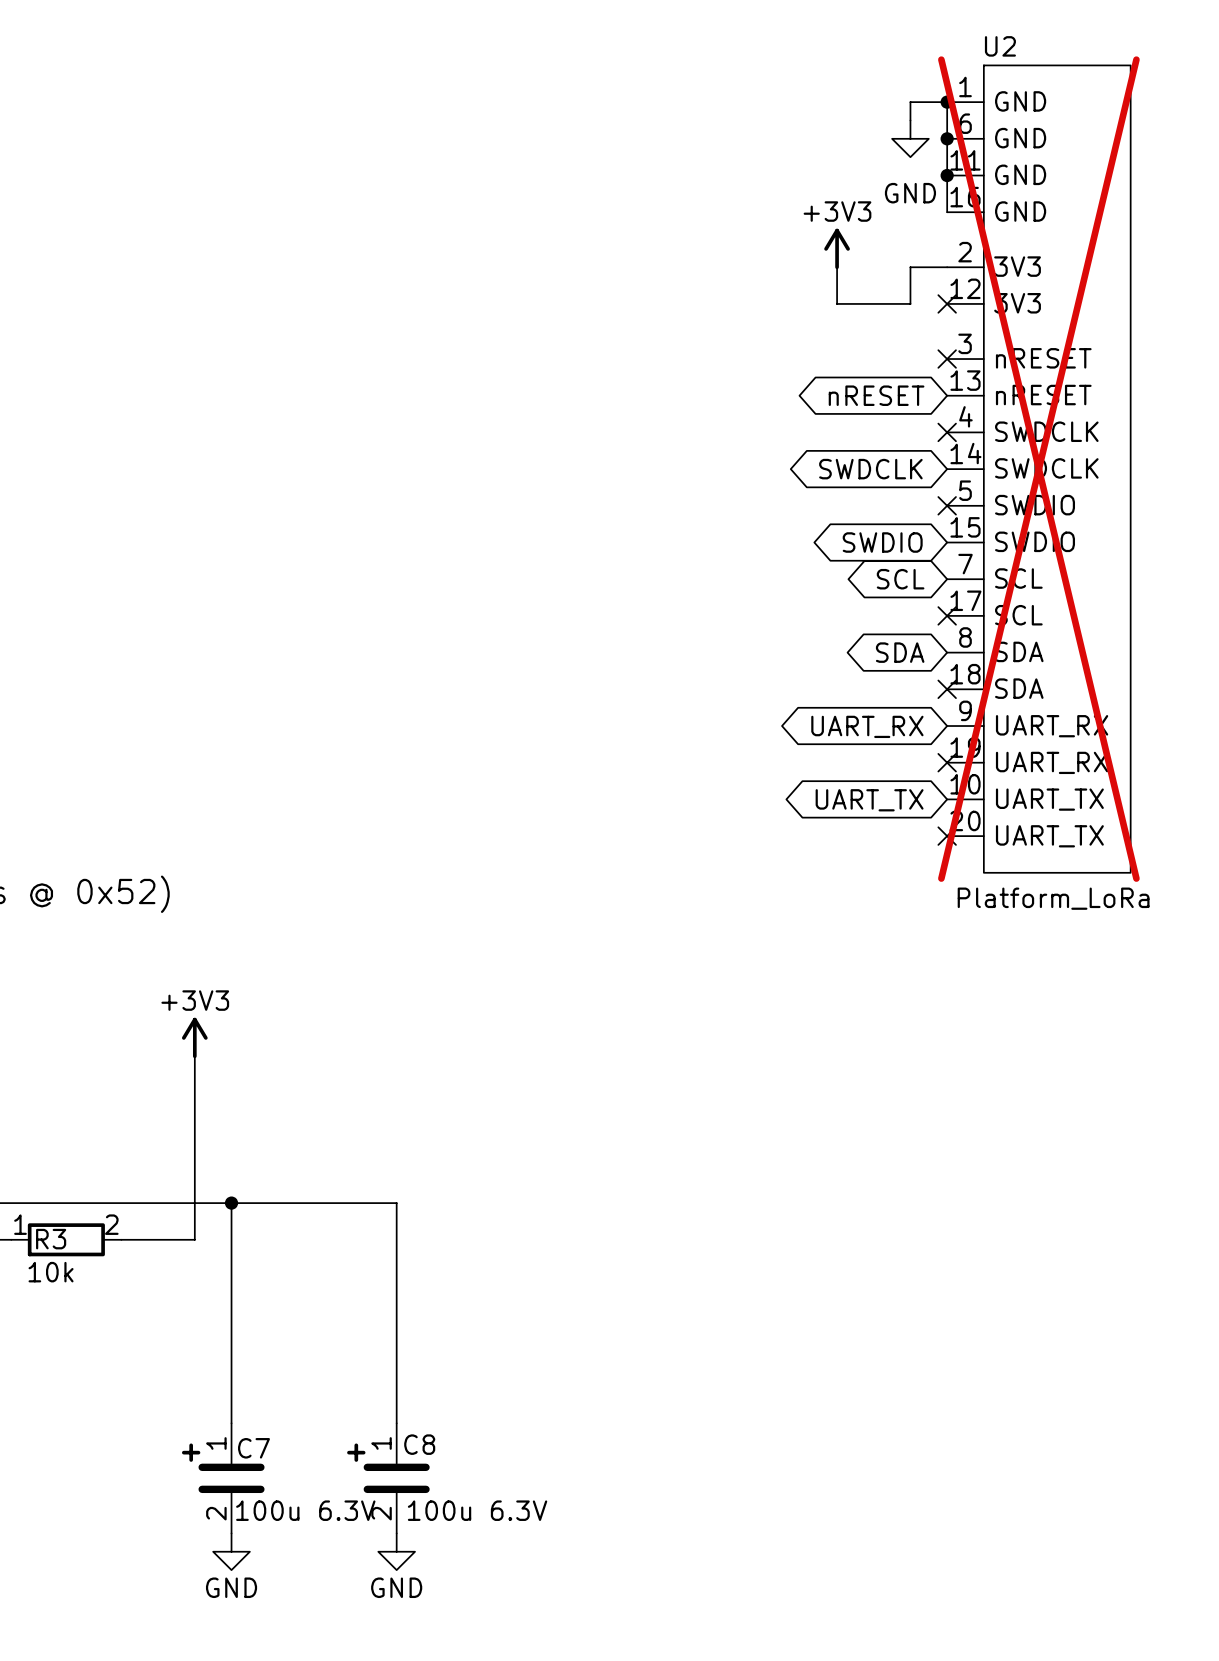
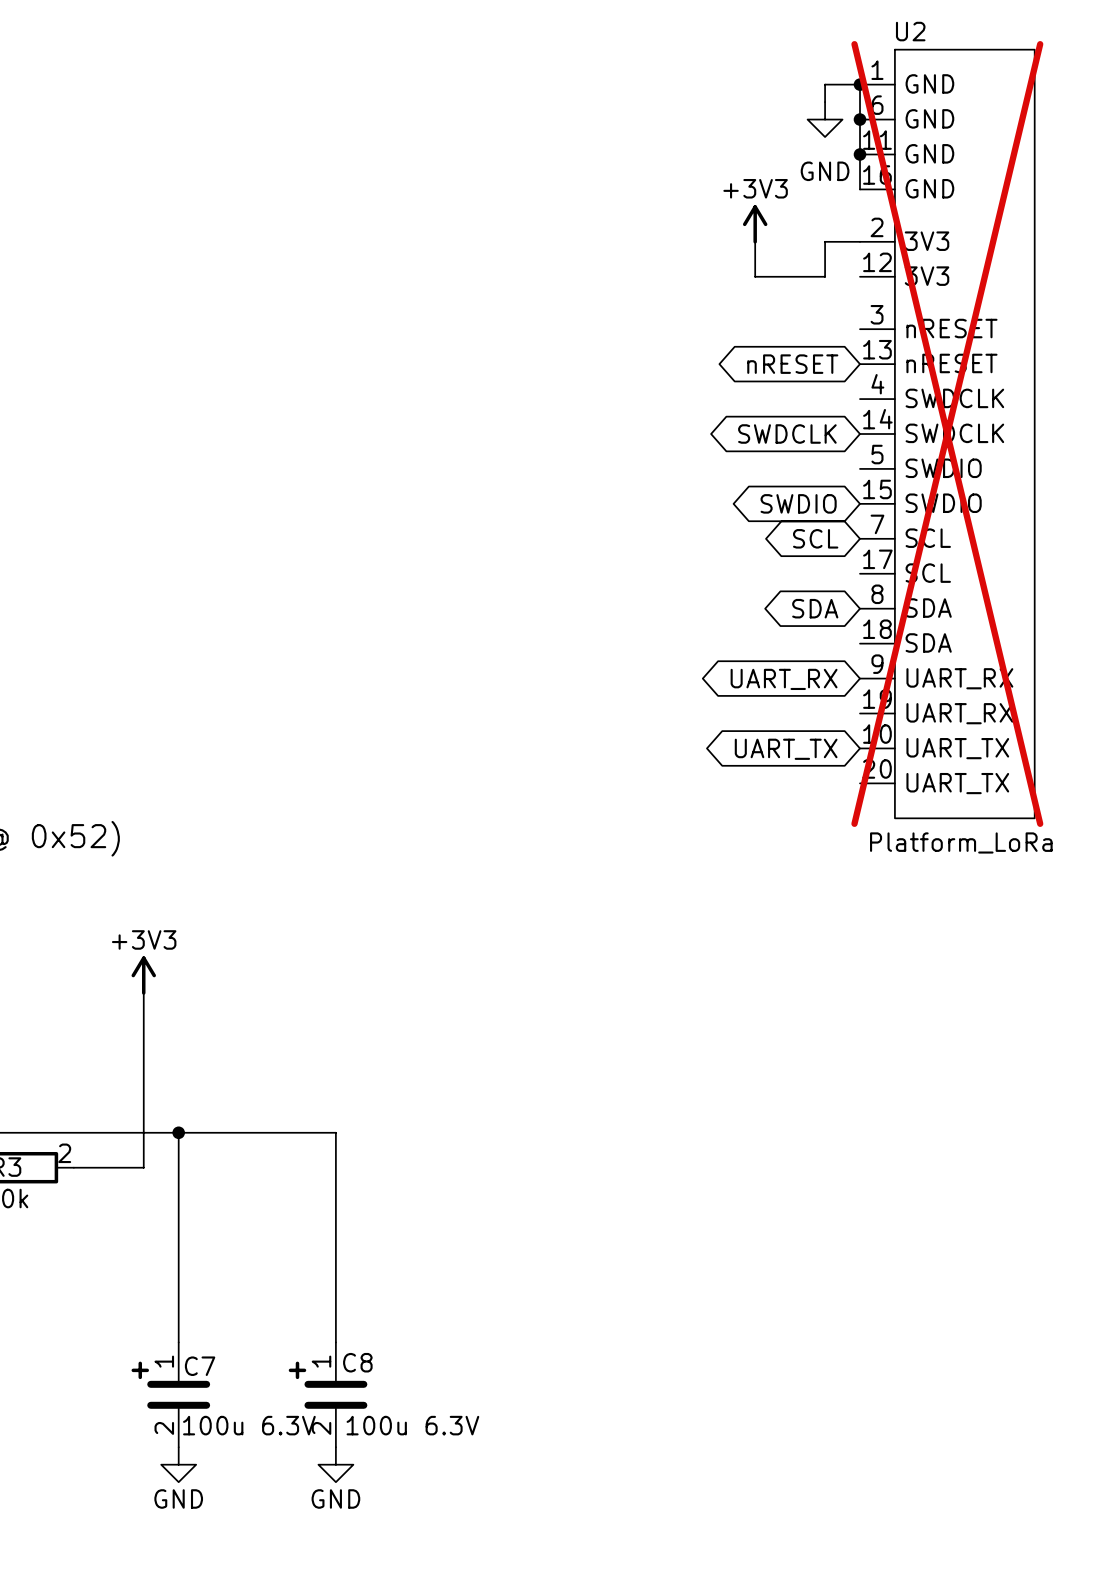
no-connect mark: (947, 303) -> none
no-connect mark: (947, 359) -> none
no-connect mark: (947, 432) -> none
no-connect mark: (947, 505) -> none
no-connect mark: (947, 615) -> none
no-connect mark: (947, 689) -> none
no-connect mark: (947, 762) -> none
no-connect mark: (947, 836) -> none

